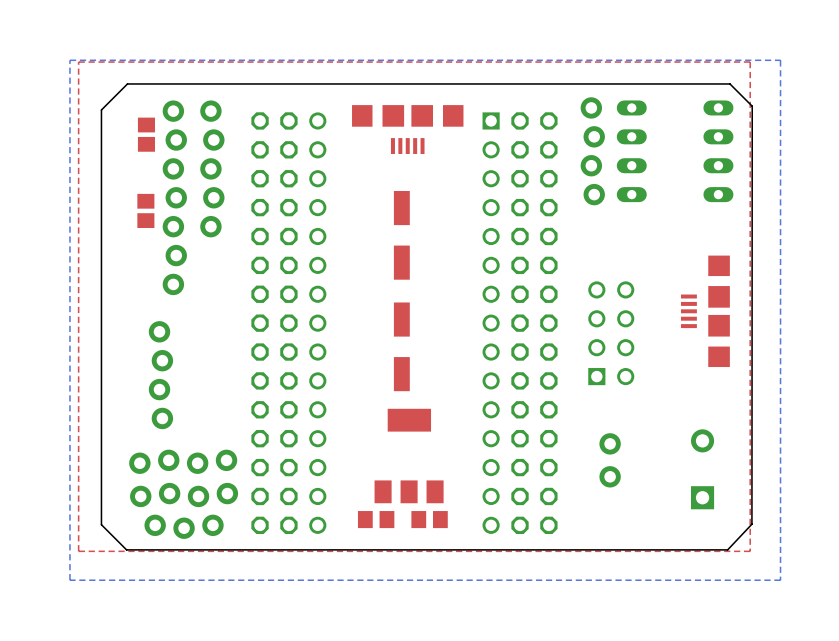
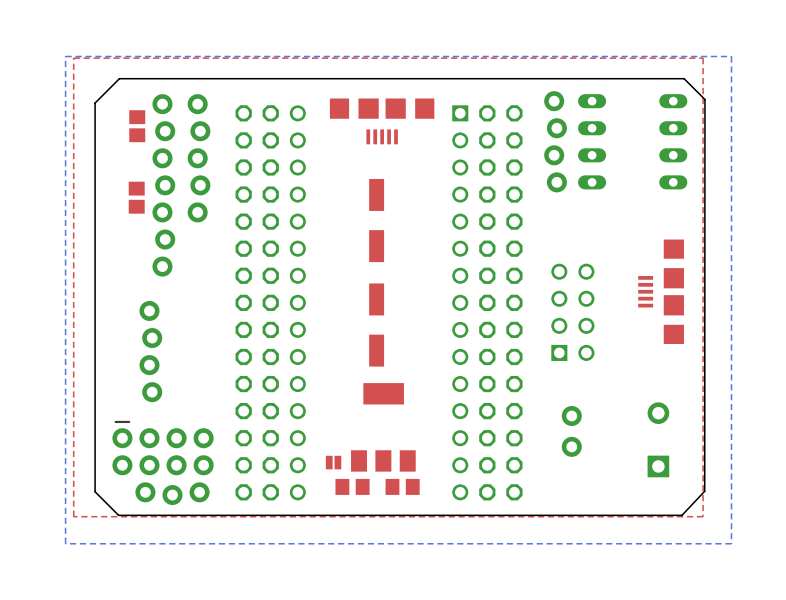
part: (183, 461) -> none
part: none -> (163, 448)
part: none -> (333, 462)
part: (184, 495) -> none

